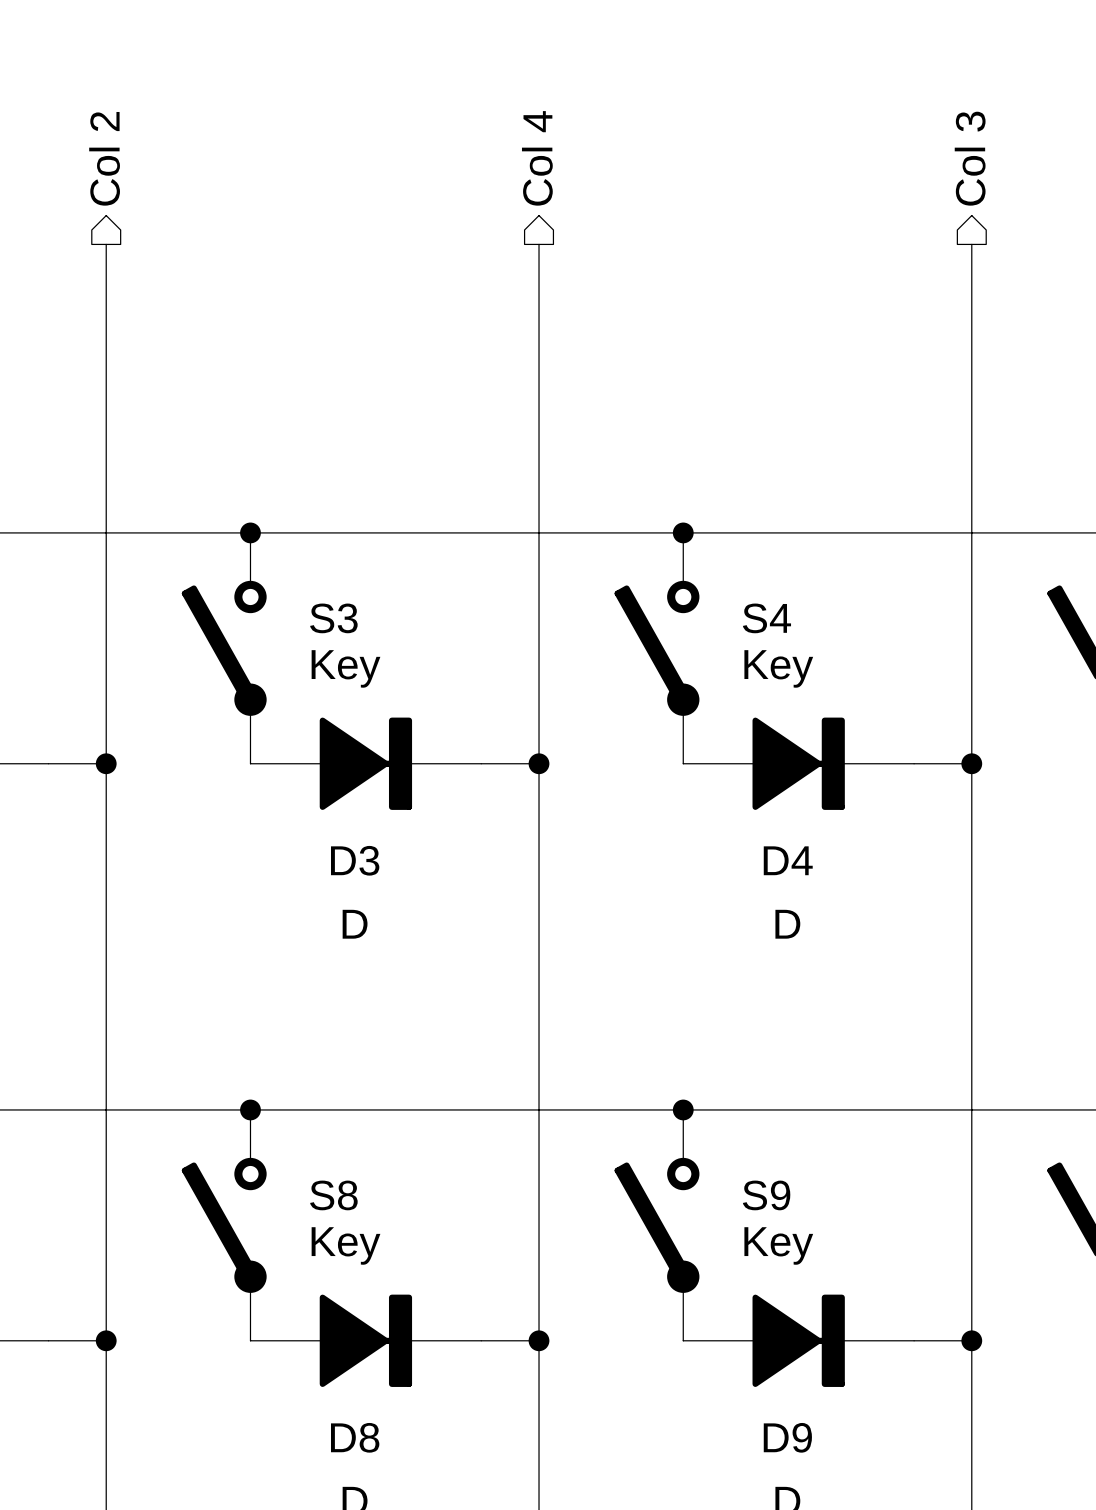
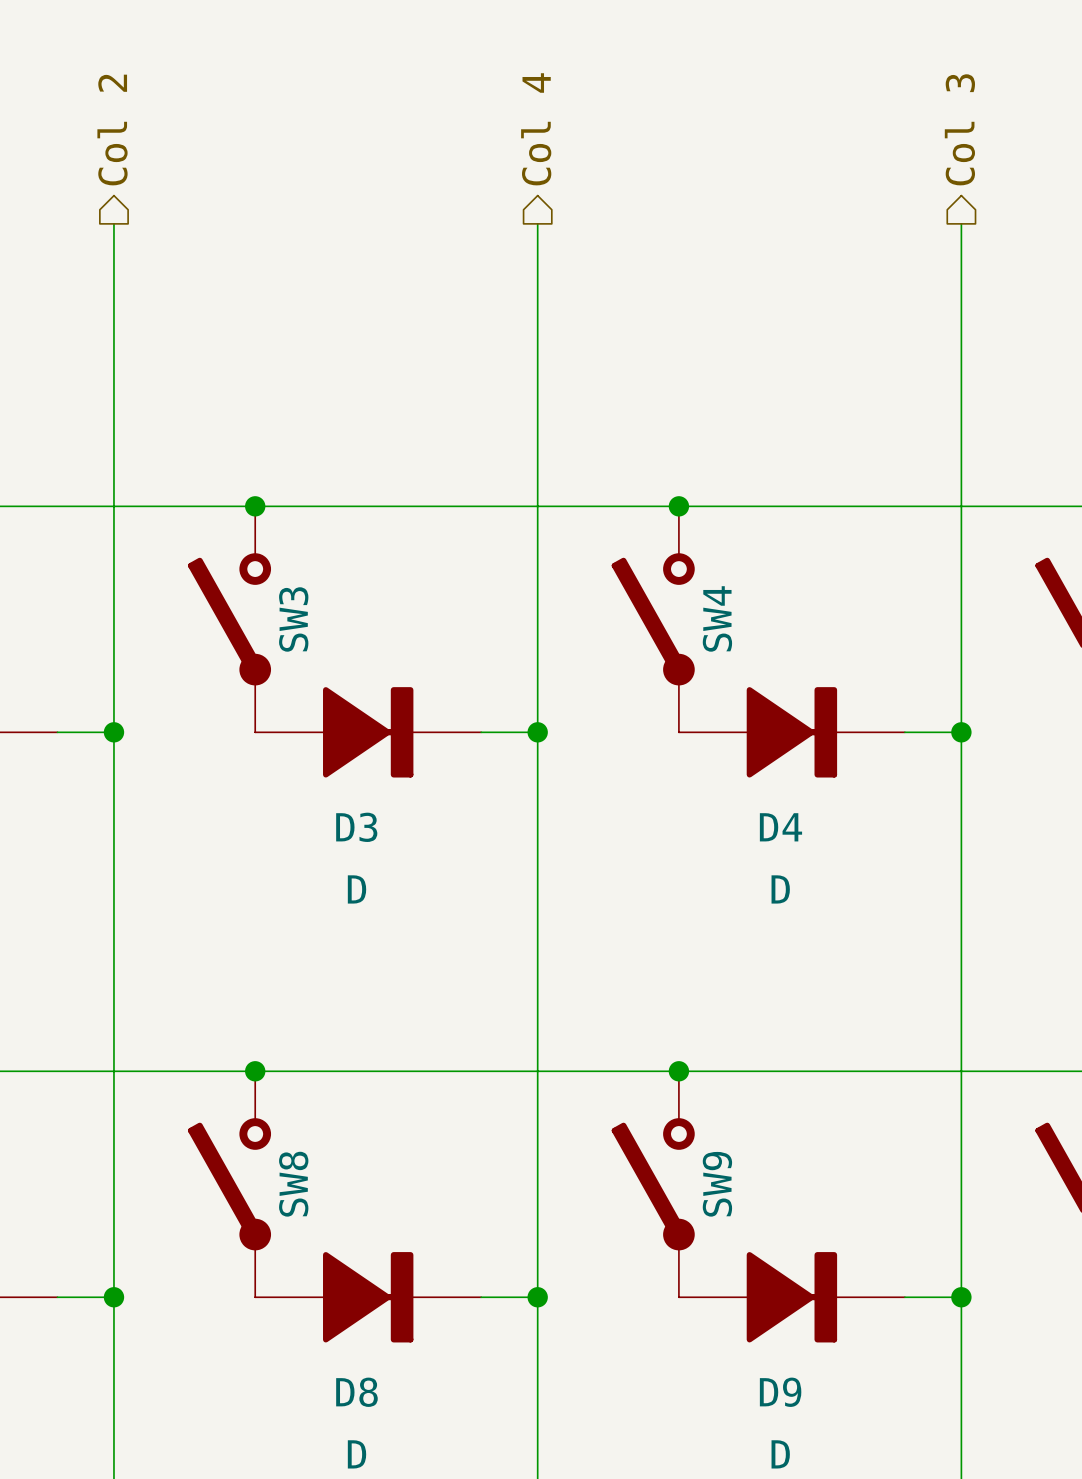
S3 name: S3 (333, 618) -> SW3 (293, 619)
S4 name: S4 (766, 618) -> SW4 (717, 618)
S3 value: Key (346, 668) -> none
S4 value: Key (778, 668) -> none
S8 name: S8 (333, 1195) -> SW8 (293, 1184)
S9 name: S9 (766, 1195) -> SW9 (717, 1184)
S8 value: Key (346, 1245) -> none
S9 value: Key (778, 1245) -> none

